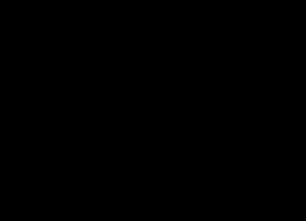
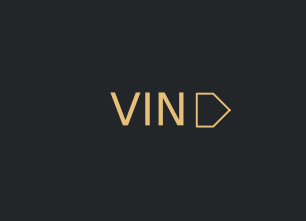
hierarchical label: none -> VIN (146, 108)

